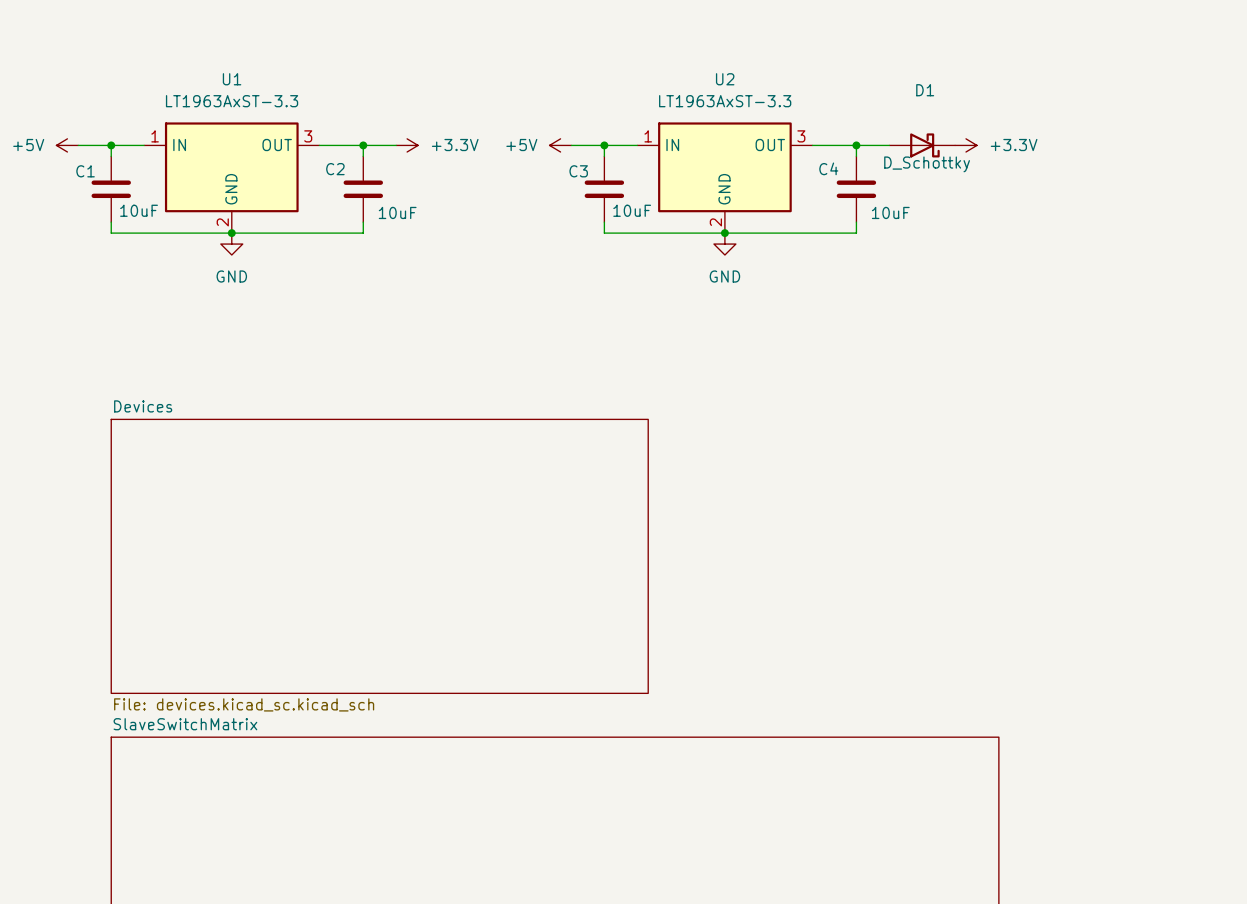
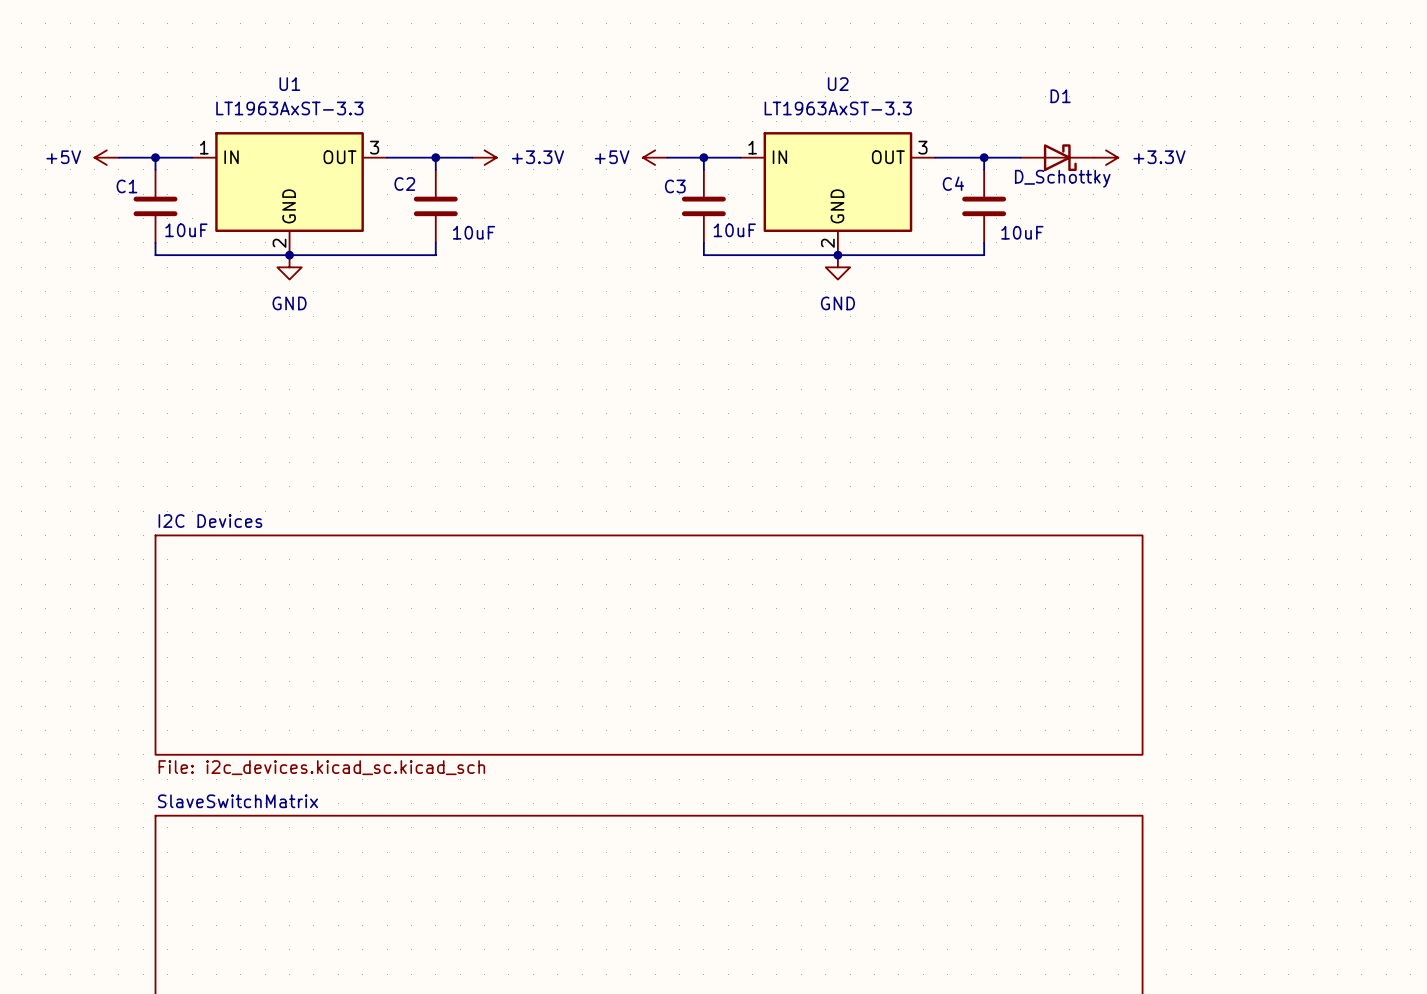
sheet Devices: File: devices.kicad_sc.kicad_sch (379, 556) -> none
sheet I2C Devices: none -> File: i2c_devices.kicad_sc.kicad_sch (649, 645)

